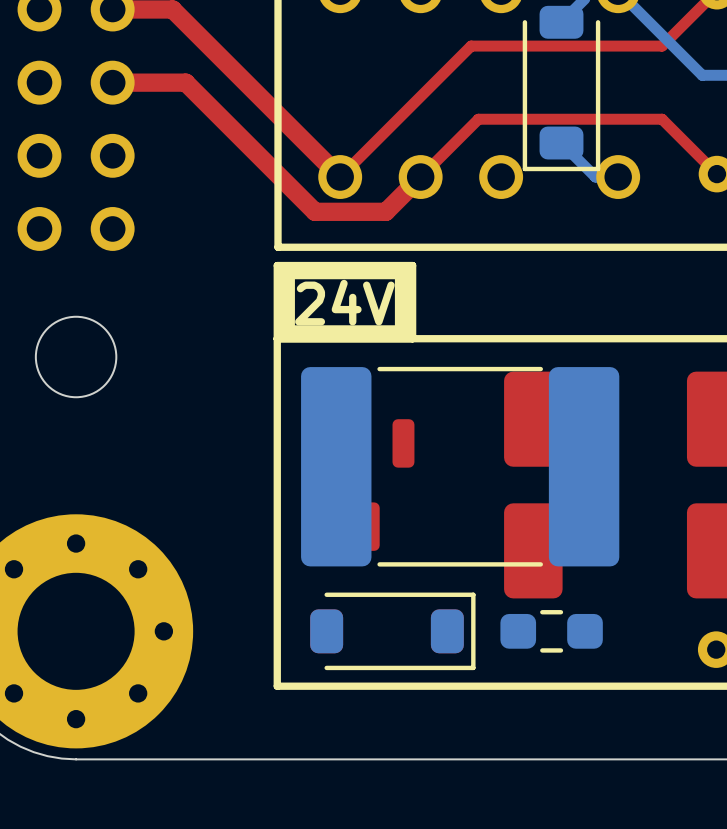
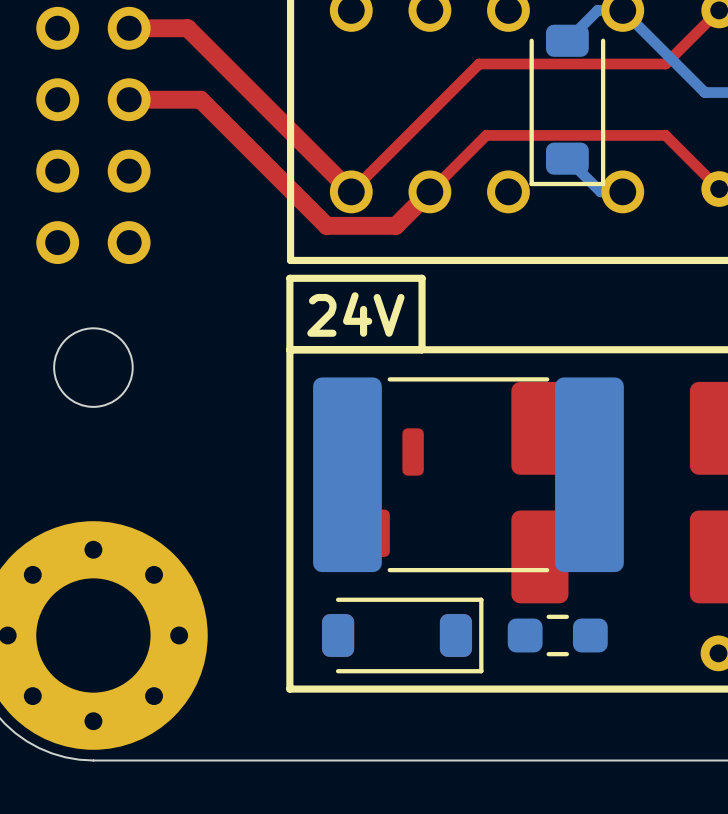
drawing: [277, 265, 413, 339] -> none

